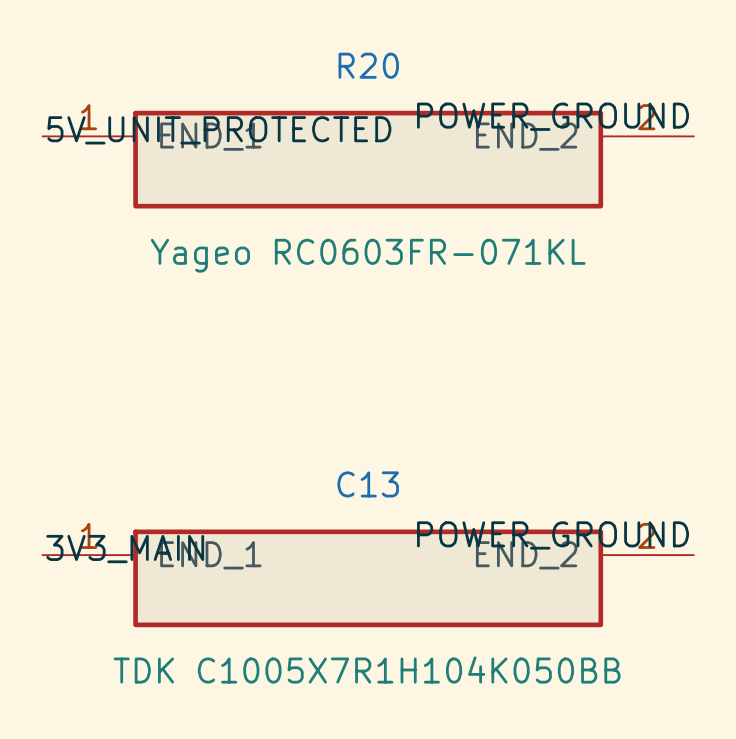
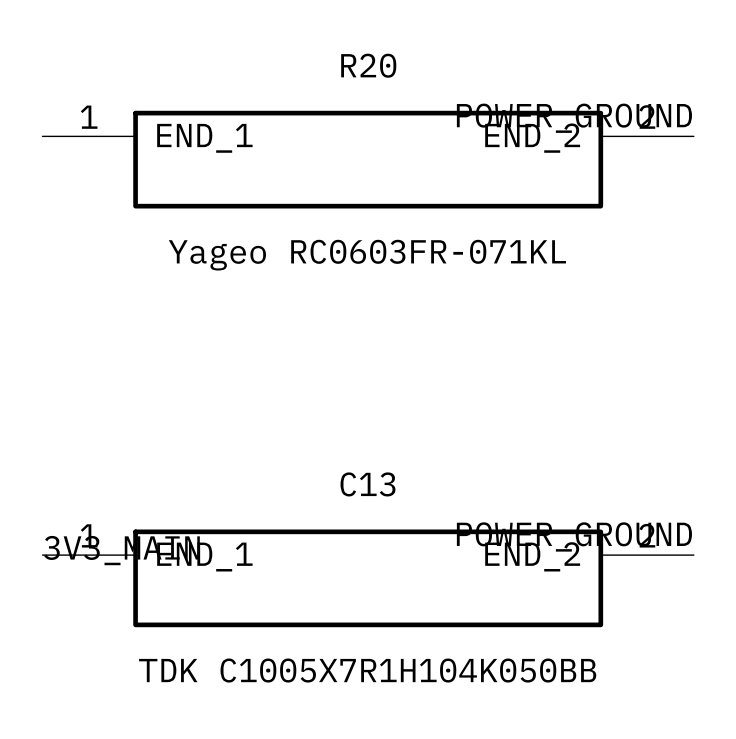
label: 5V_UNIT_PROTECTED (219, 130) -> none

